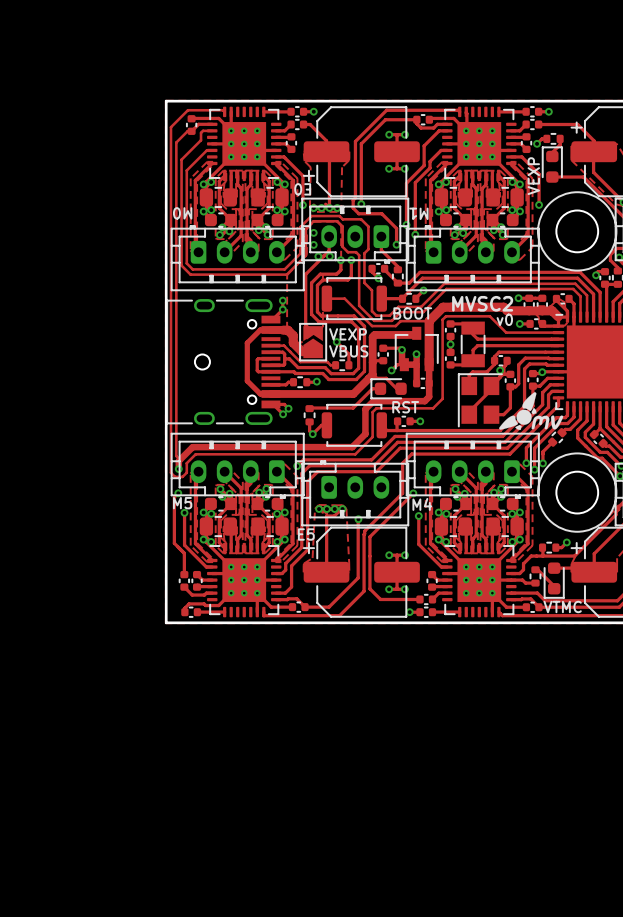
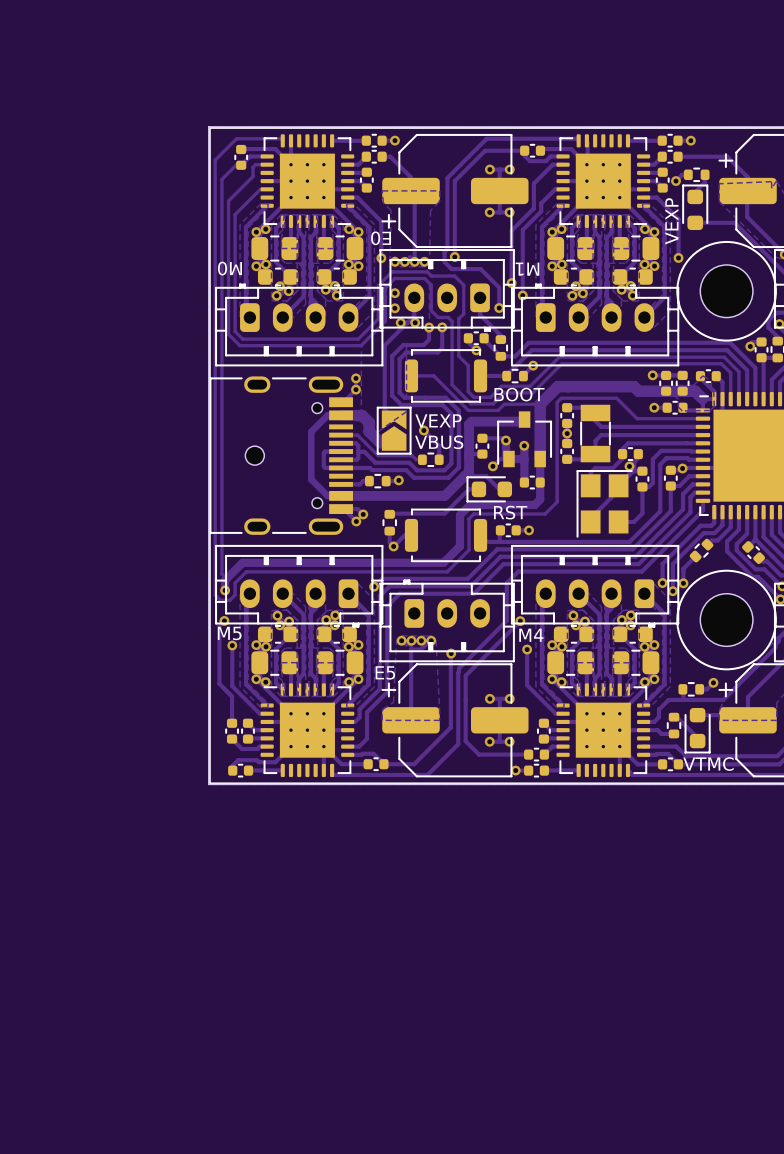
text: MVSC2 (482, 303) -> none
text: v0 (504, 319) -> none
drawing: [499, 392, 564, 430] -> none

